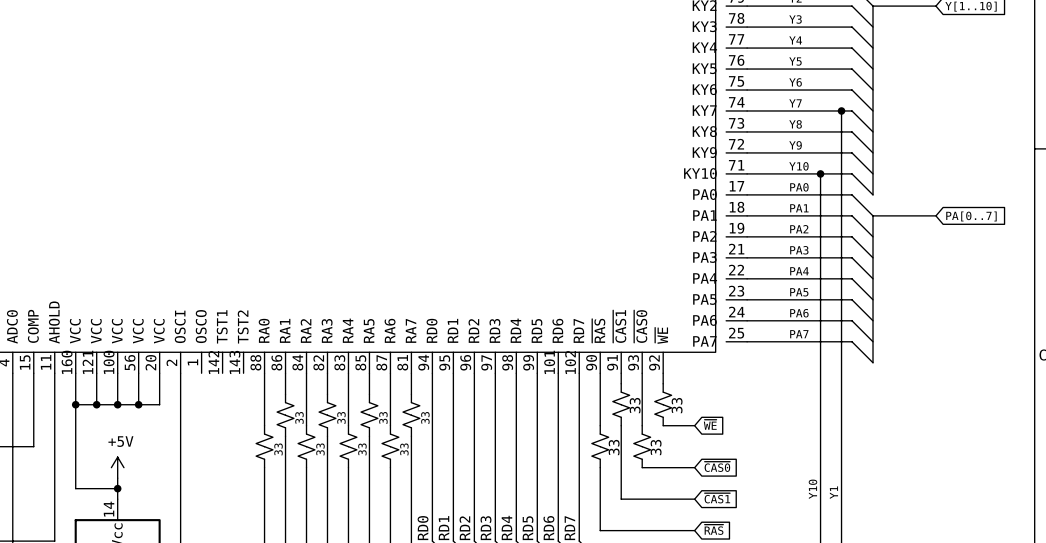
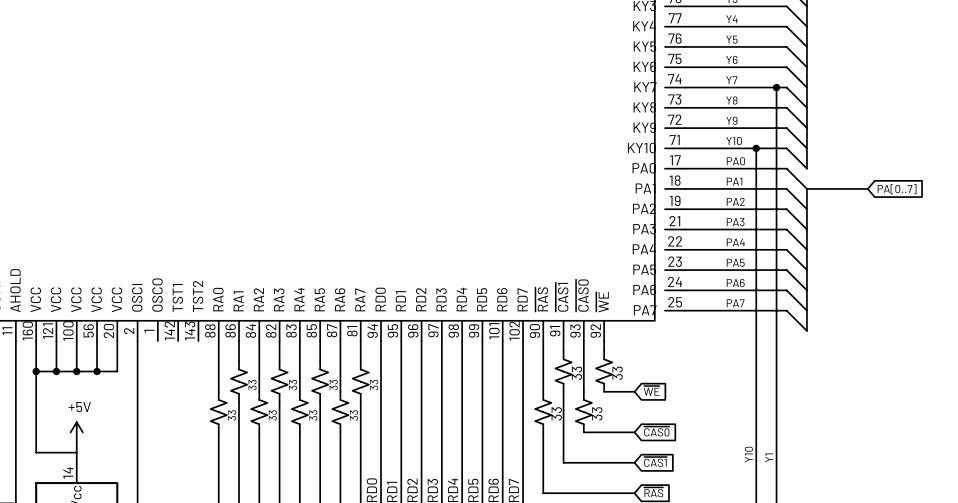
junction: (117, 488) -> none

